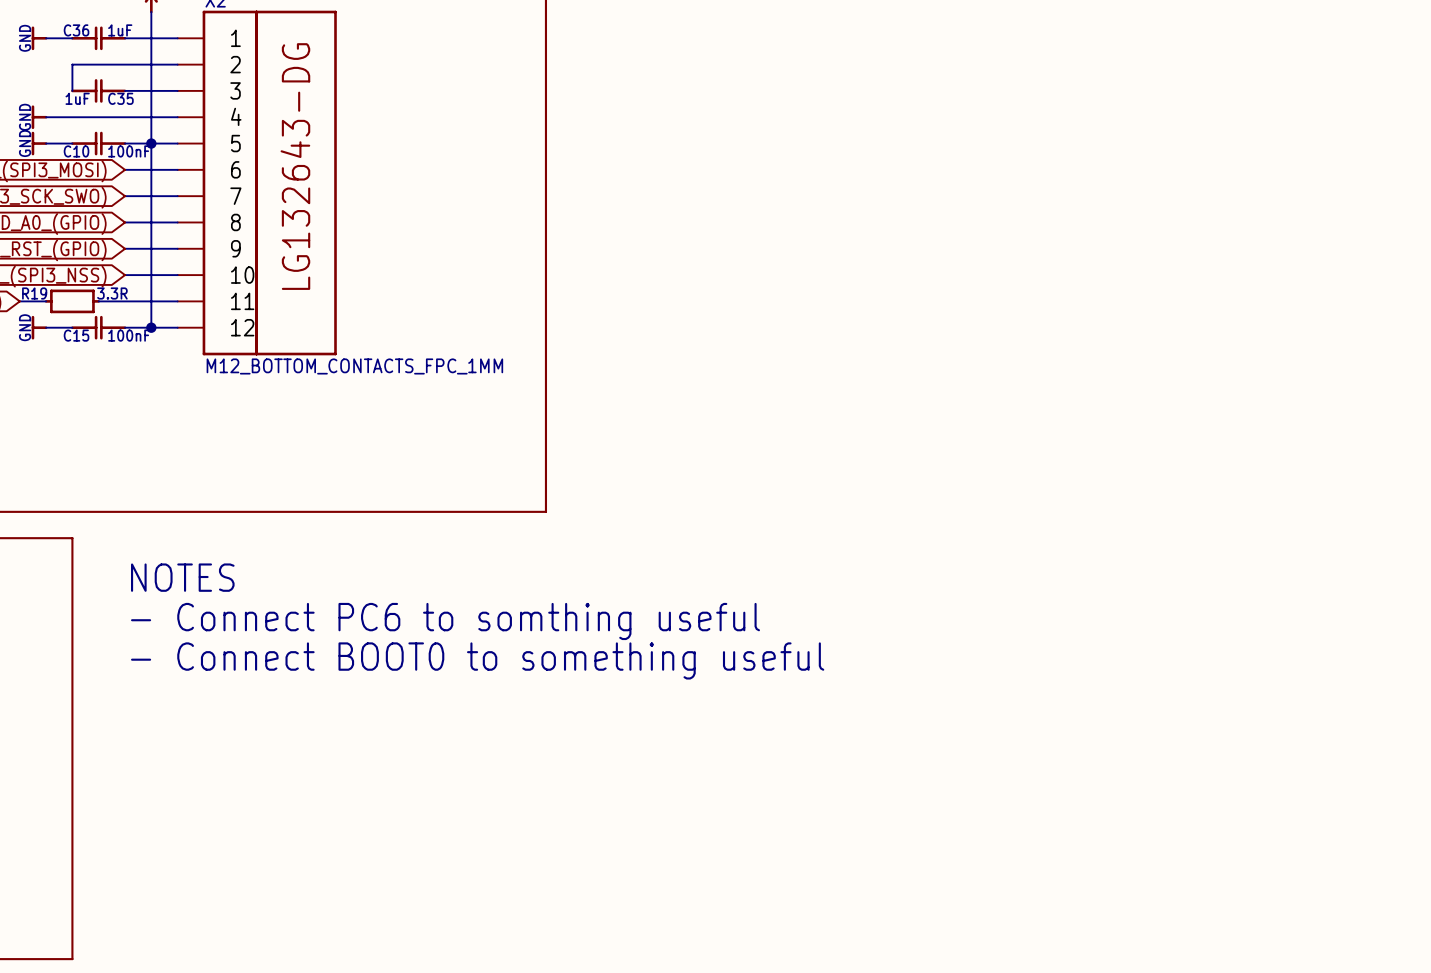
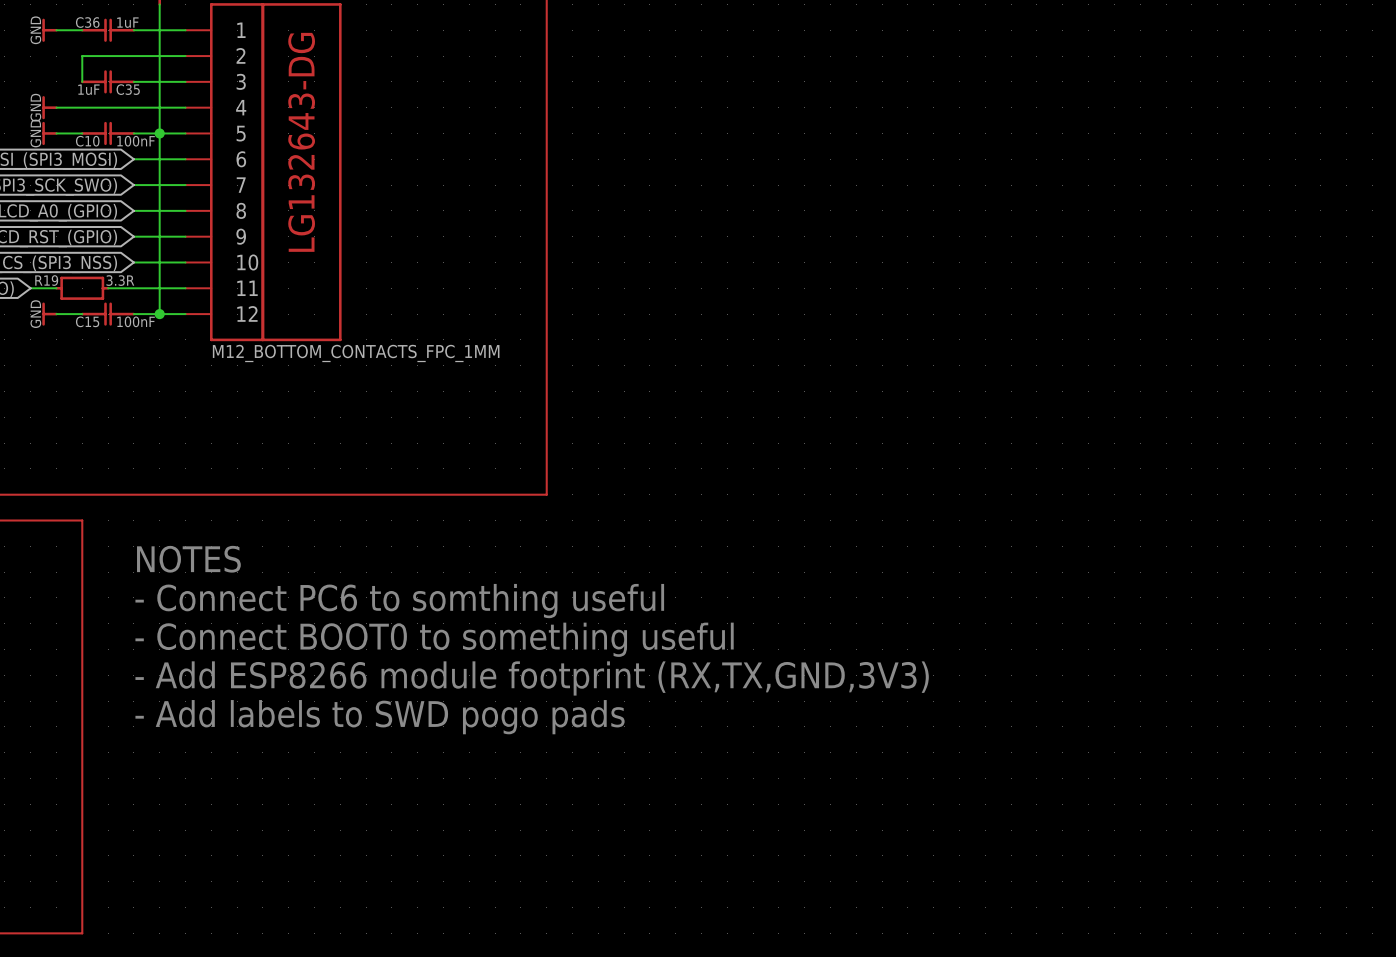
text: none -> - Add ESP8266 module footprint (RX,TX,GND,3V3) (532, 678)
text: none -> - Add labels to SWD pogo pads (380, 717)

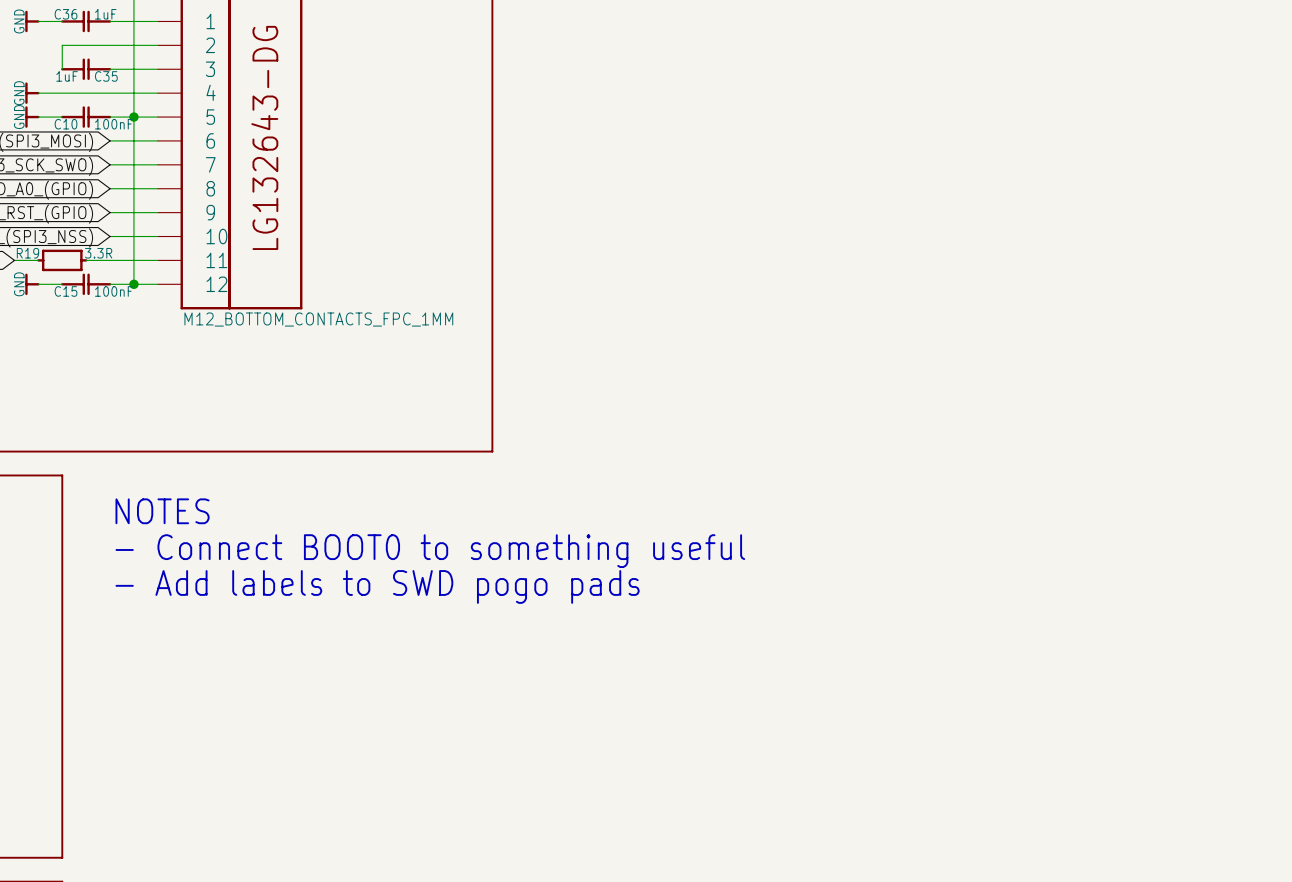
text: - Connect PC6 to somthing useful (399, 601) -> - Connect BOOT0 to something useful (430, 551)
text: - Connect BOOT0 to something useful (434, 639) -> - Add labels to SWD pogo pads (377, 586)
text: - Add ESP8266 module footprint (RX,TX,GND,3V3) (532, 678) -> none
text: - Add labels to SWD pogo pads (380, 717) -> none

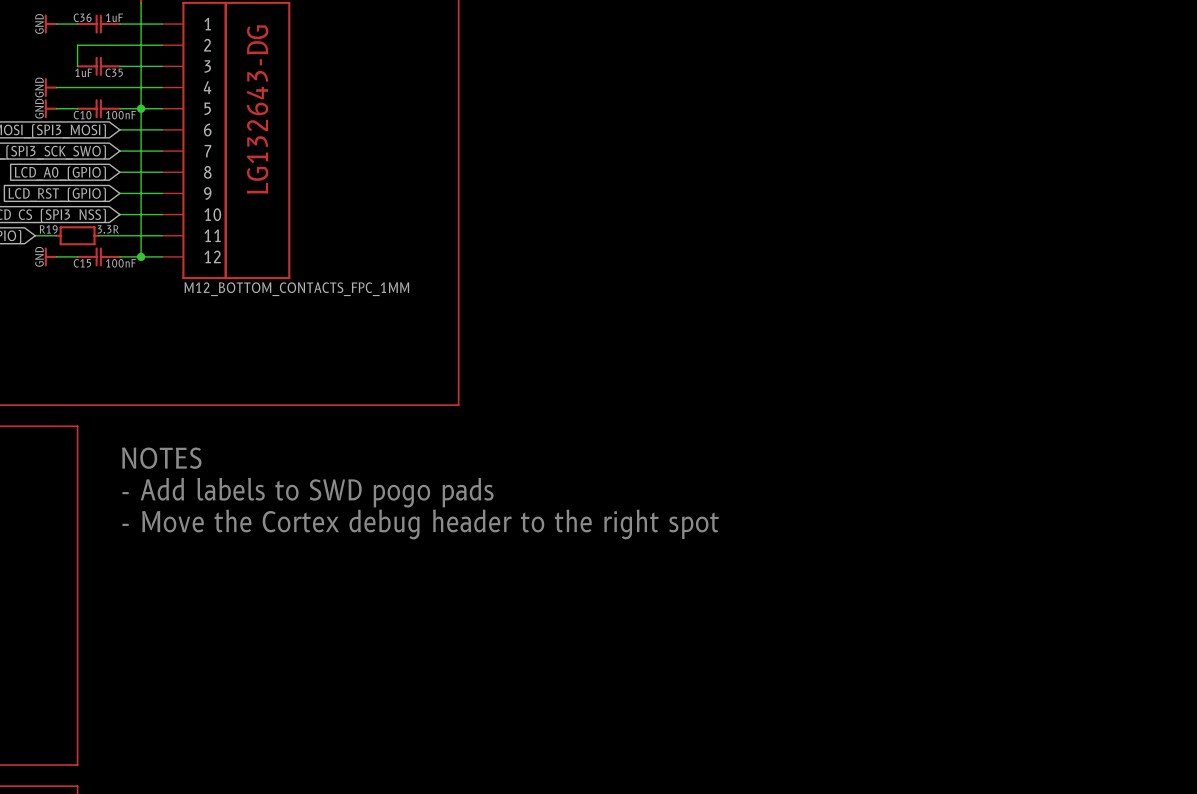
text: - Connect BOOT0 to something useful (430, 551) -> - Add labels to SWD pogo pads (307, 492)
text: - Add labels to SWD pogo pads (377, 586) -> - Move the Cortex debug header to the right spot (420, 524)

